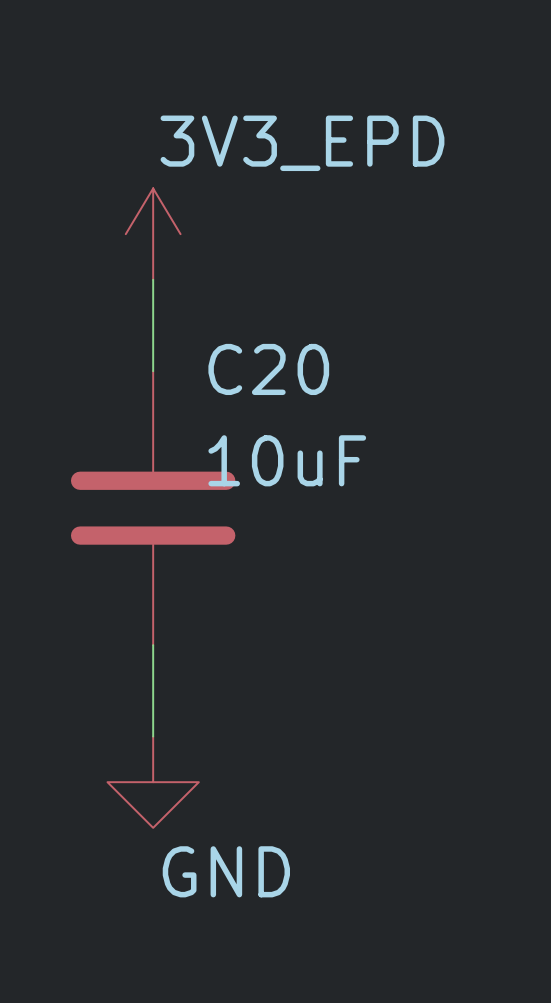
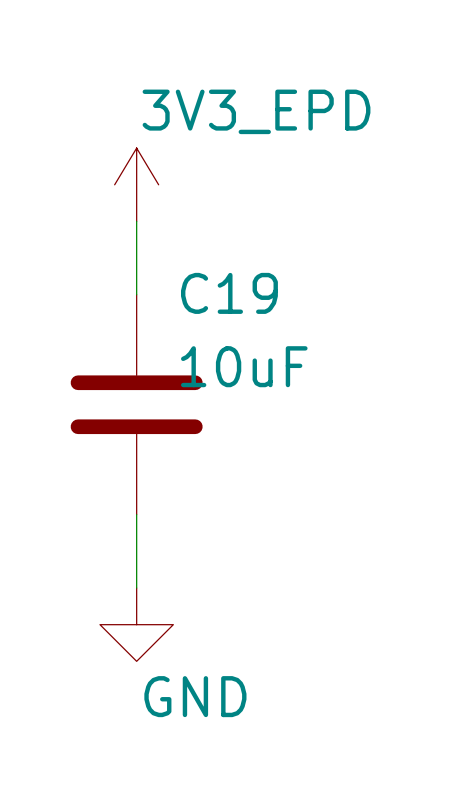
C20 name: C20 (268, 369) -> C19 (229, 293)

